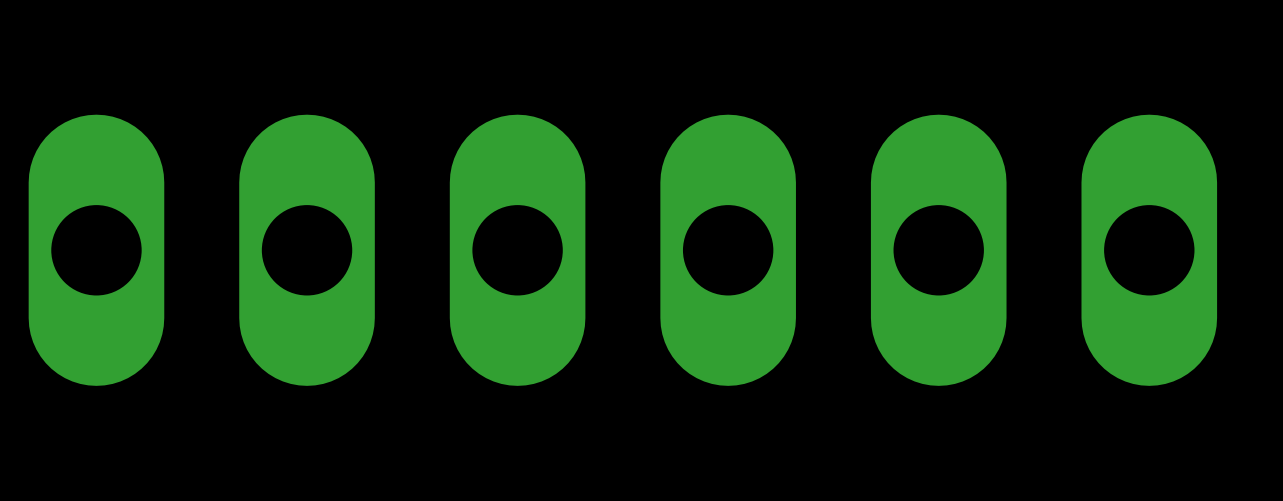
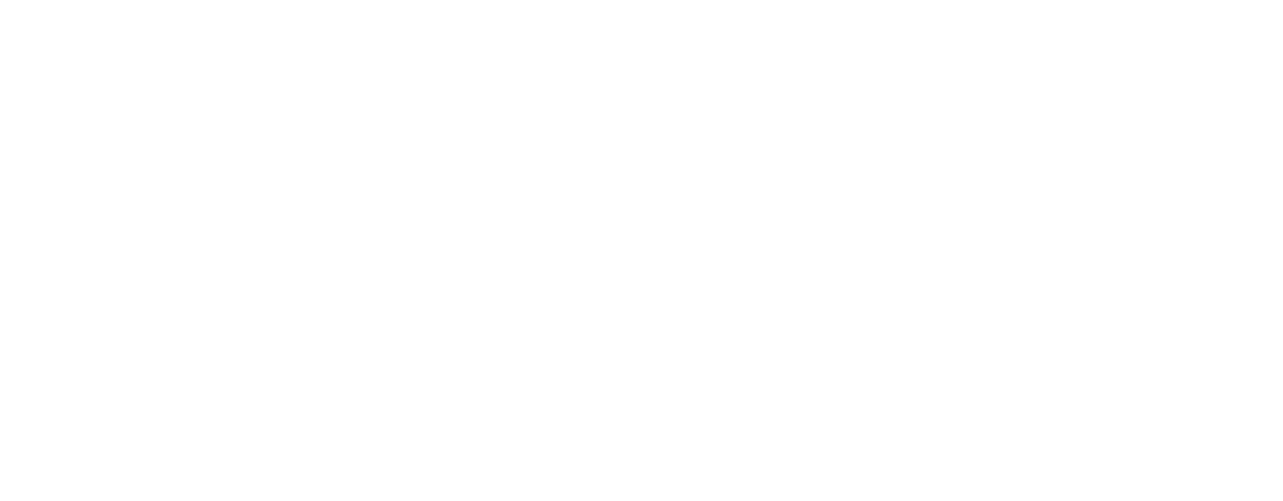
part: (622, 250) -> none

